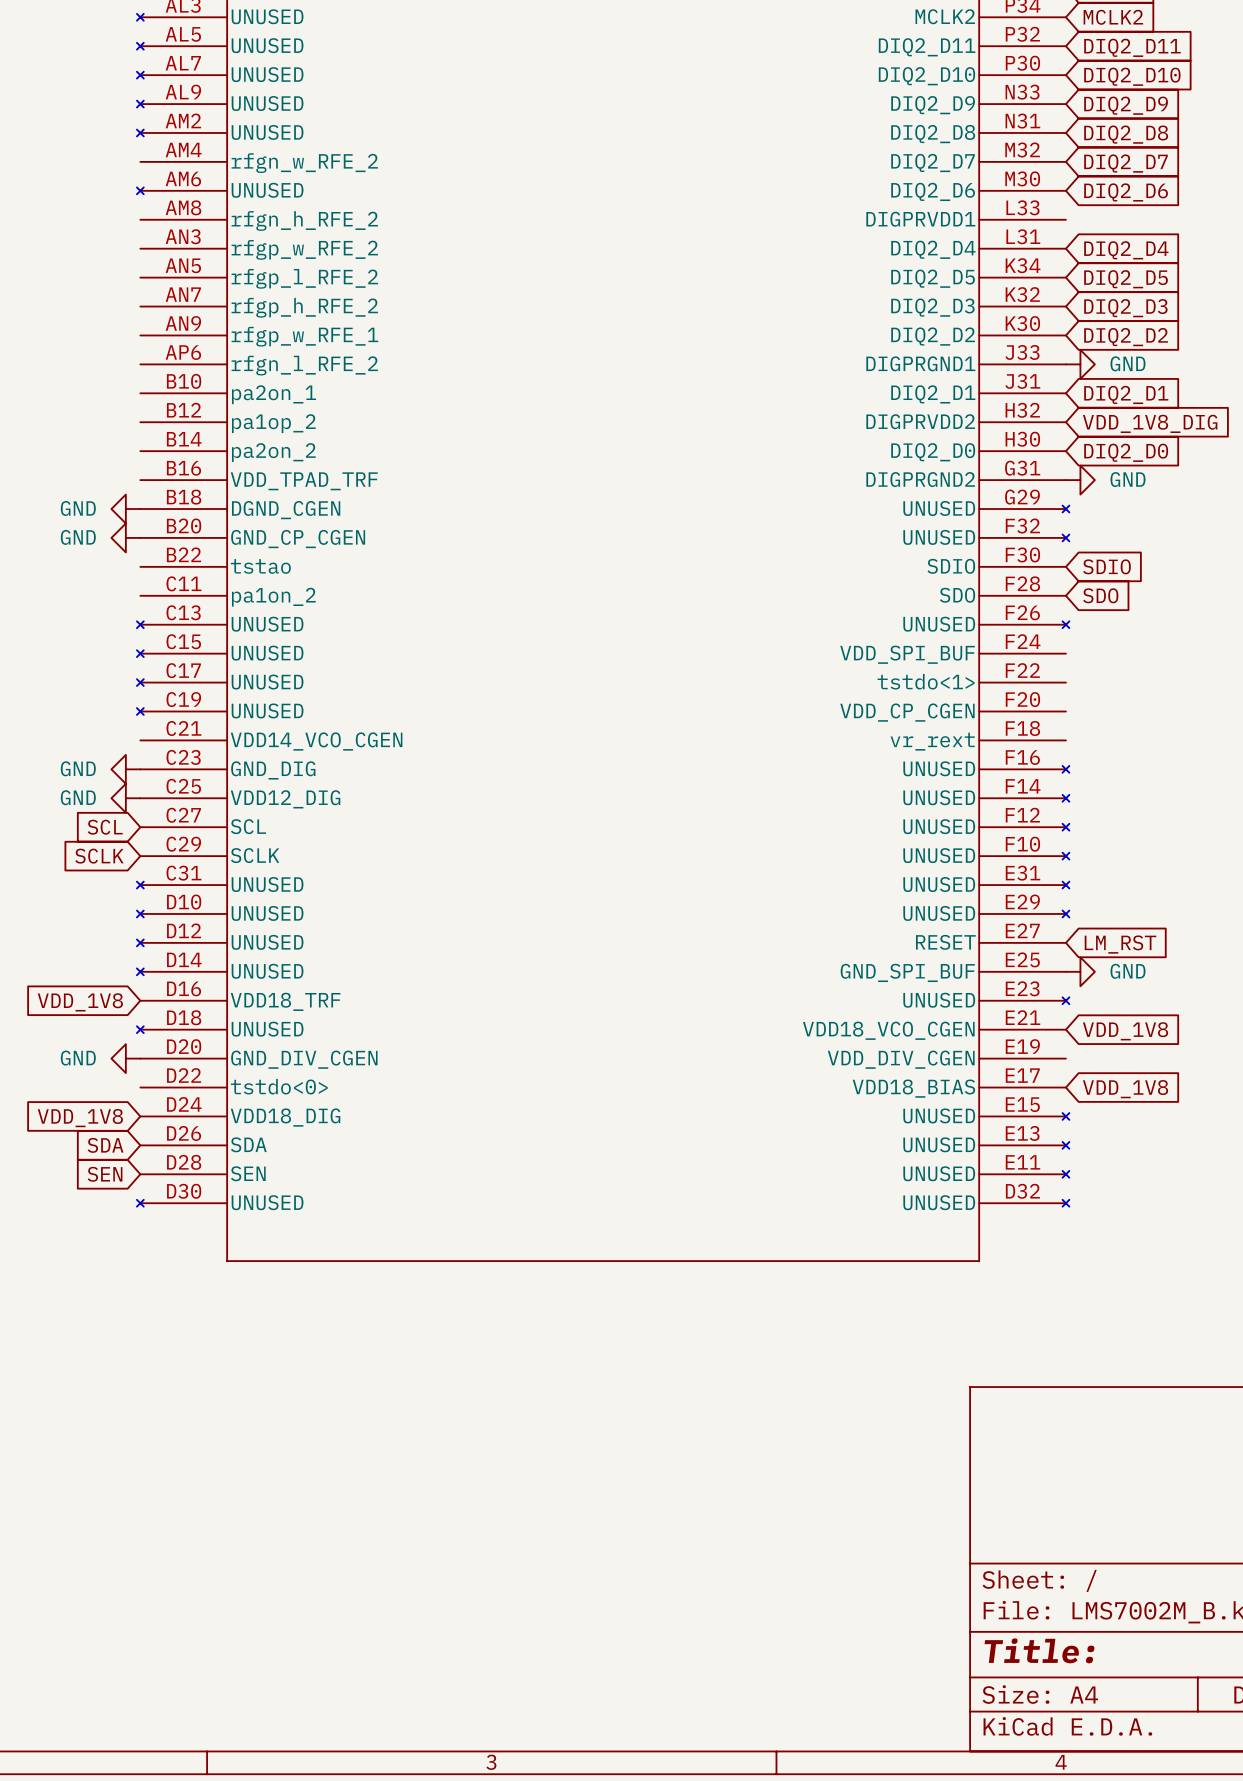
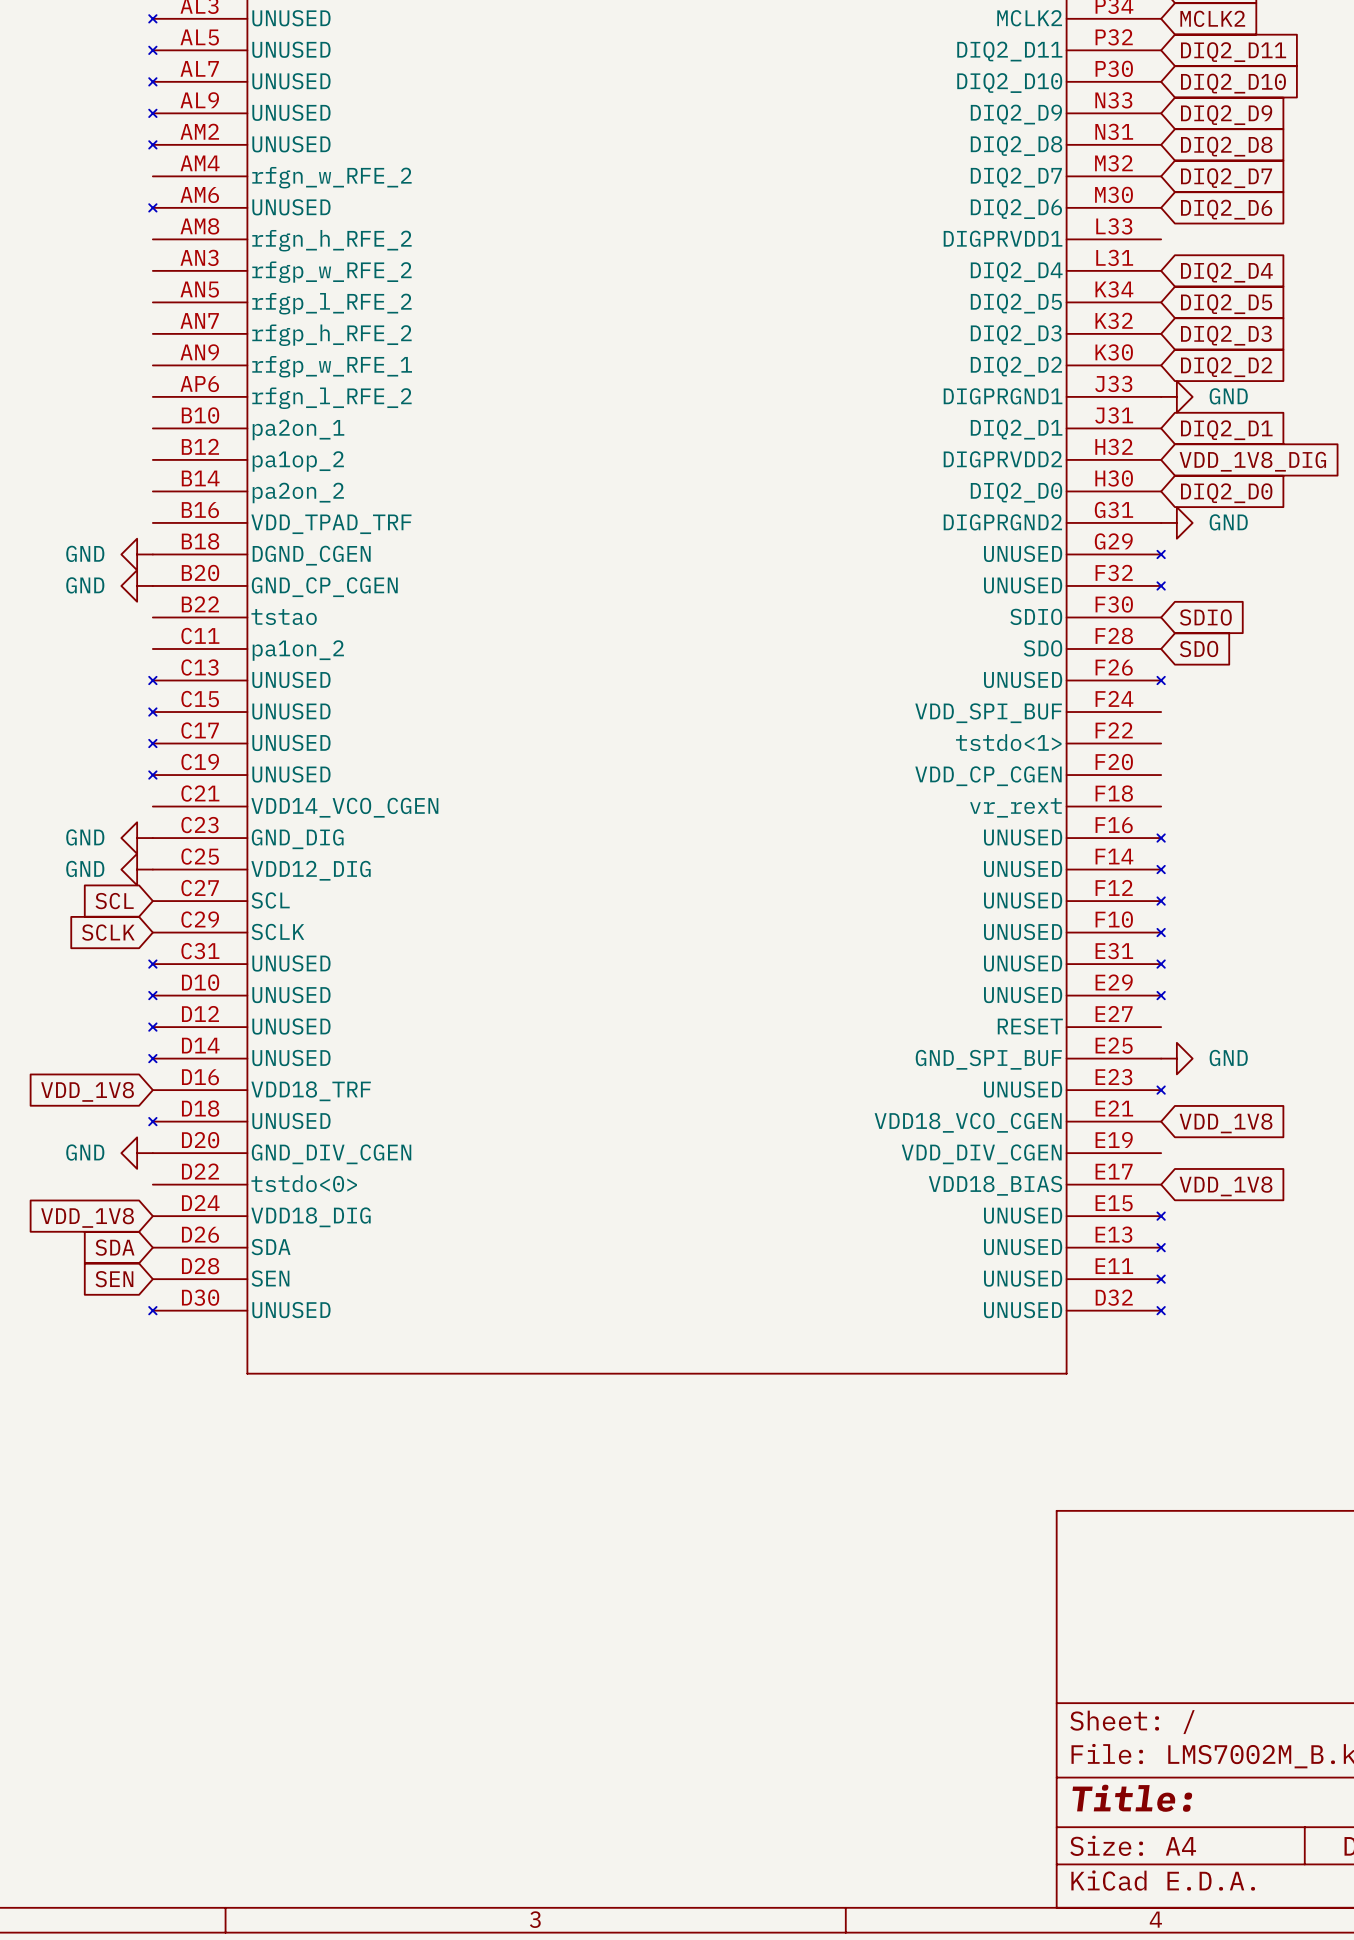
global label: LM_RST (1120, 944) -> none

